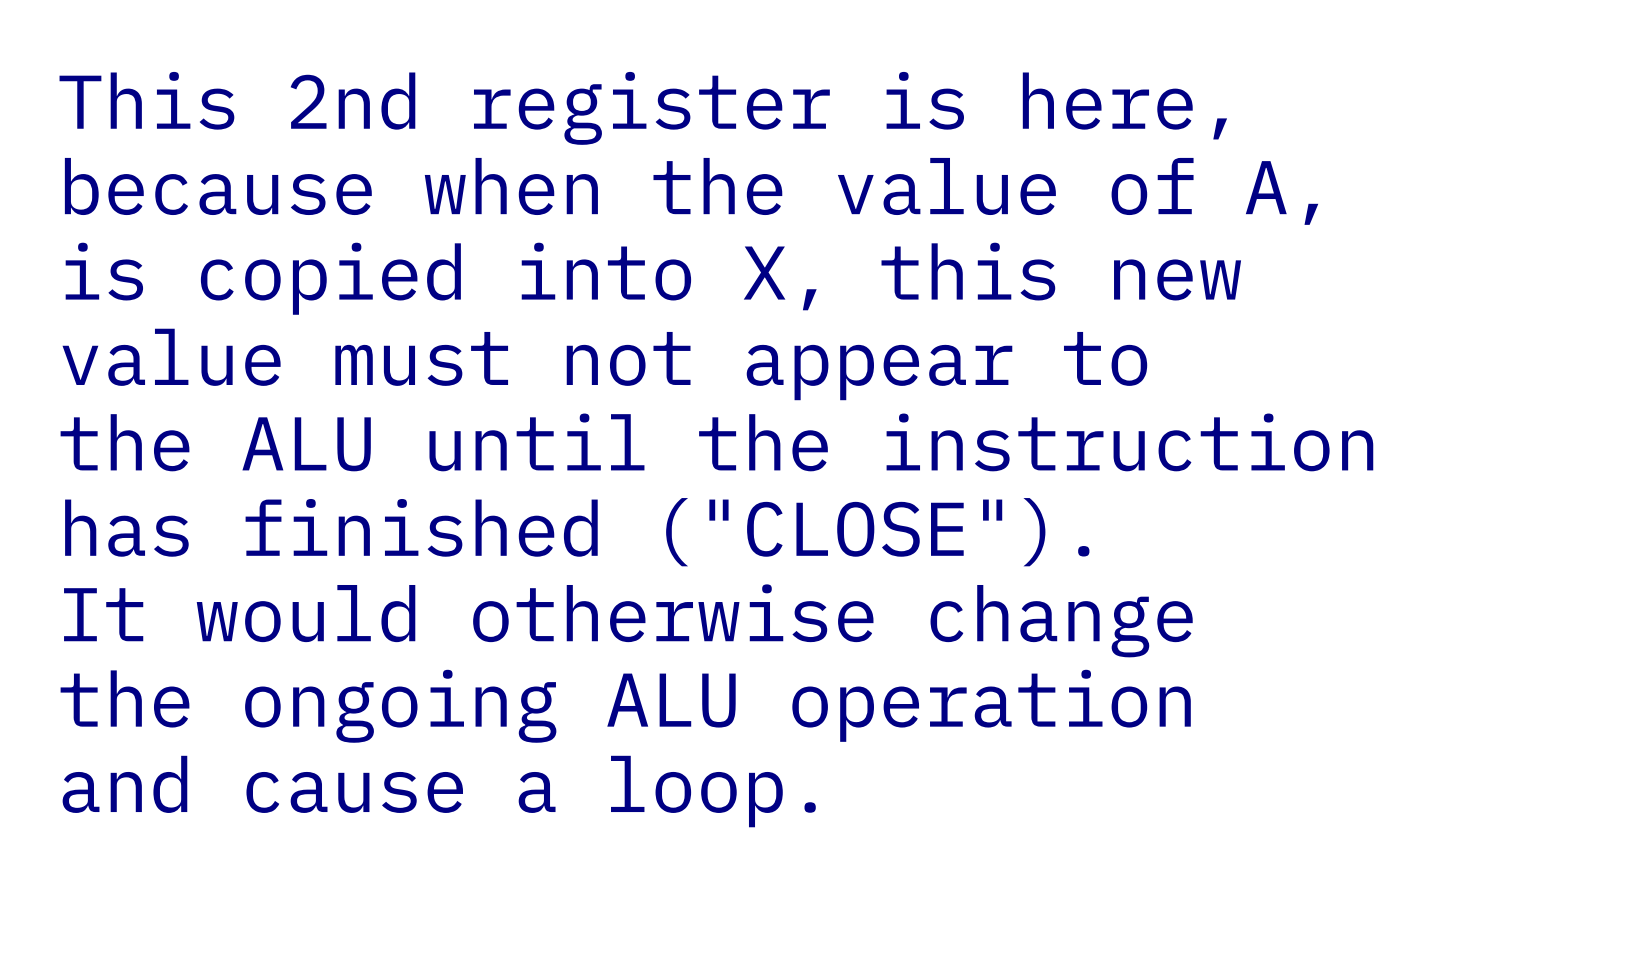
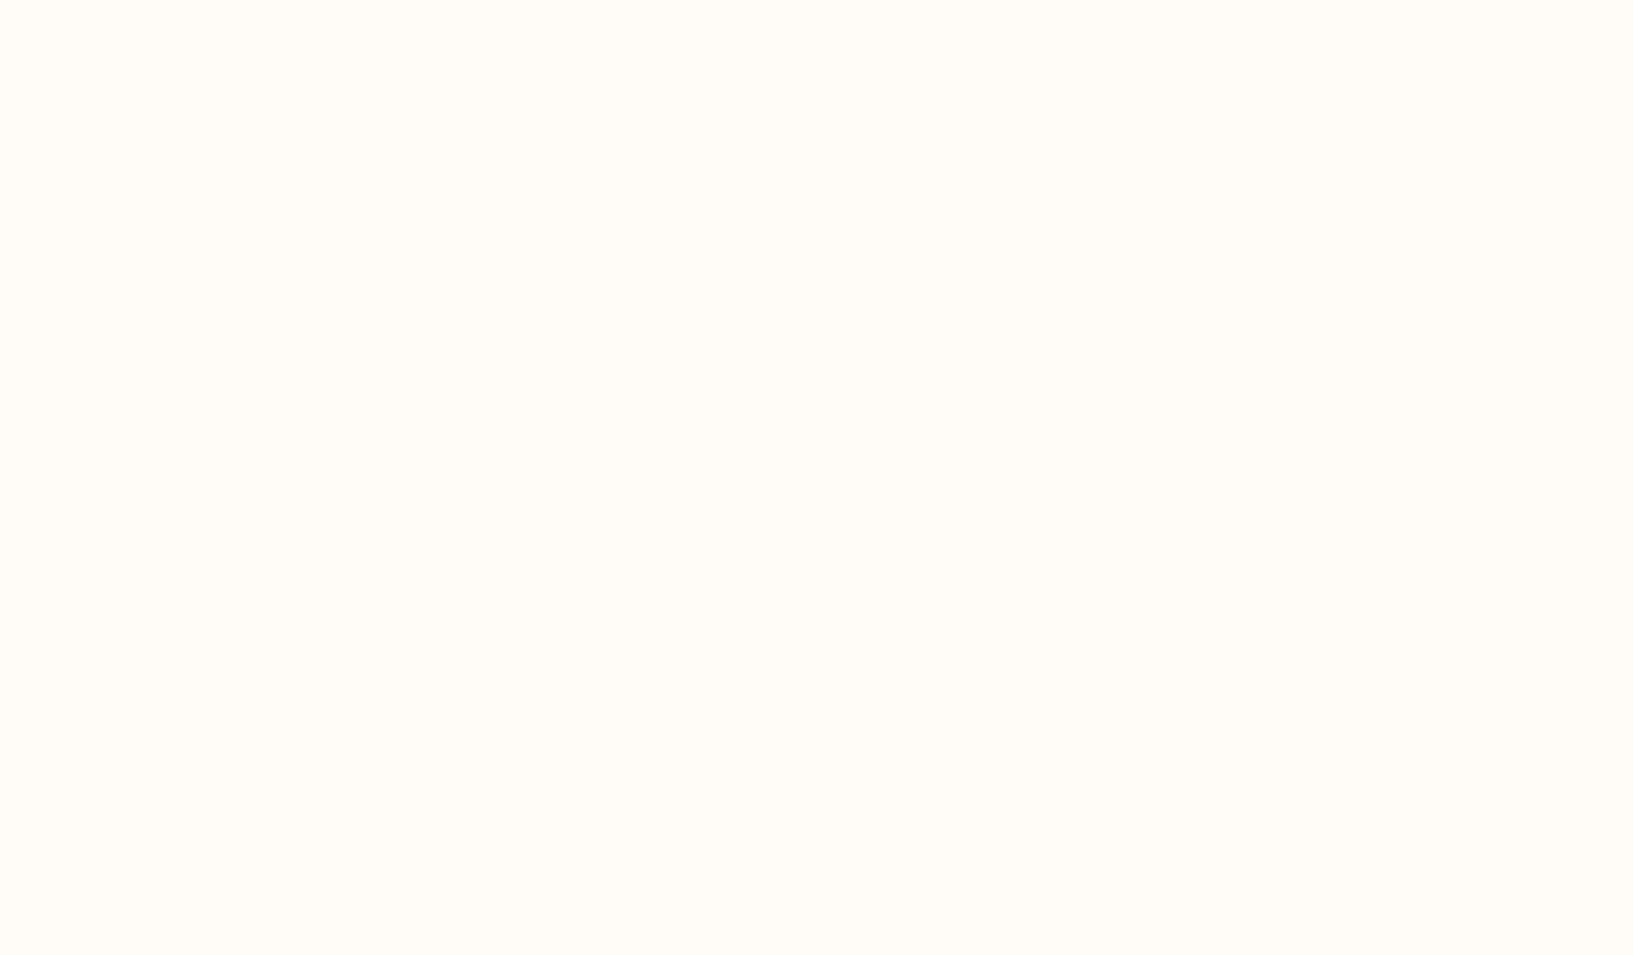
text: This 2nd register is here, (643, 108) -> none
text: because when the value of A, (691, 191) -> none
text: is copied into X, this new (653, 278) -> none
text: value must not appear to (604, 364) -> none
text: the ALU until the instruction (716, 442) -> none
text: has finished ("CLOSE"). (577, 532) -> none
text: It would otherwise change (628, 620) -> none
text: the ongoing ALU operation (625, 706) -> none
text: and cause a loop. (439, 791) -> none

